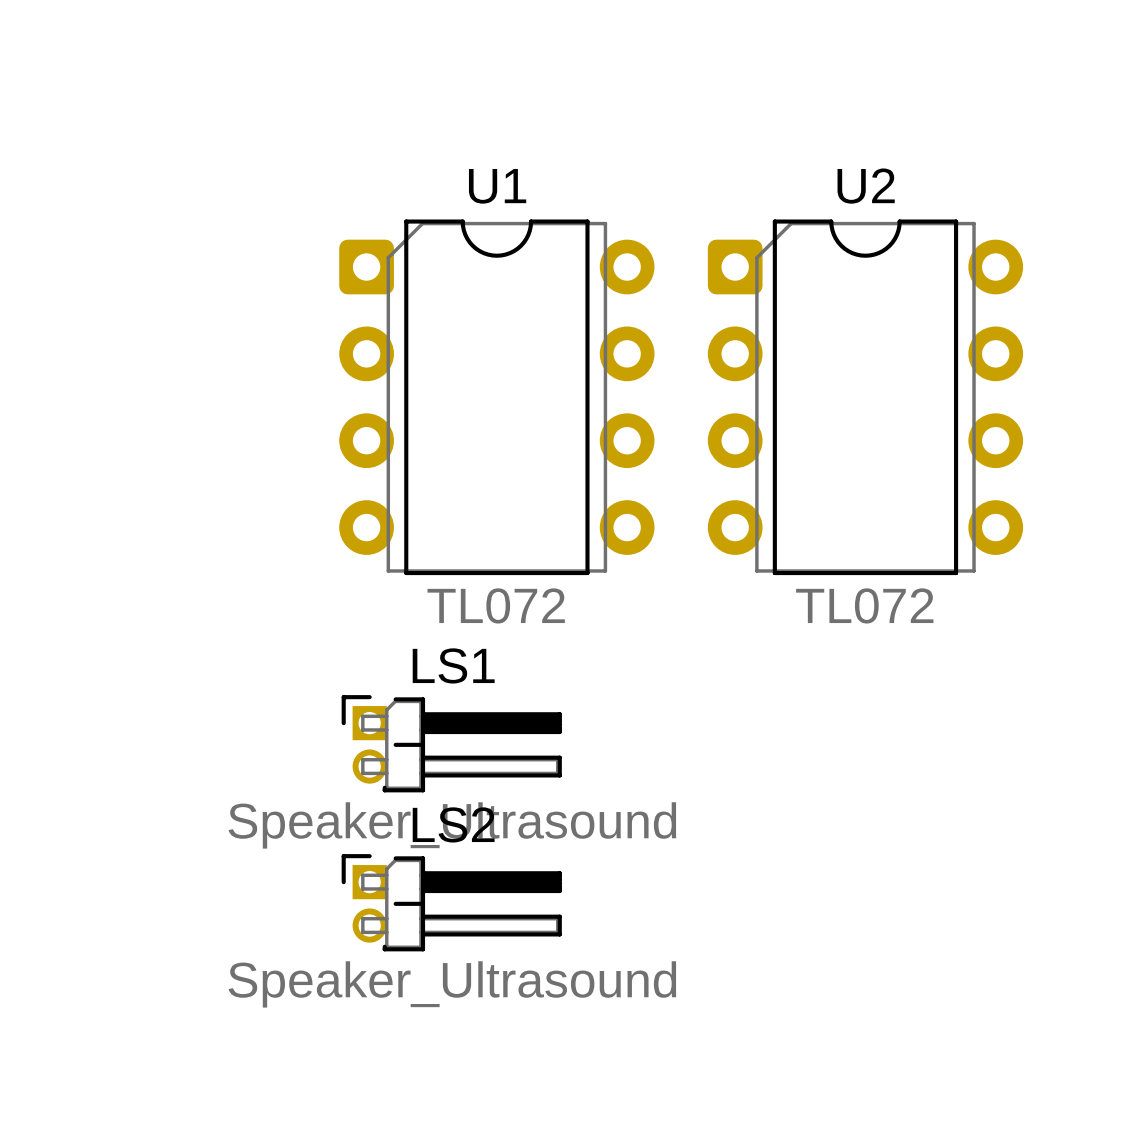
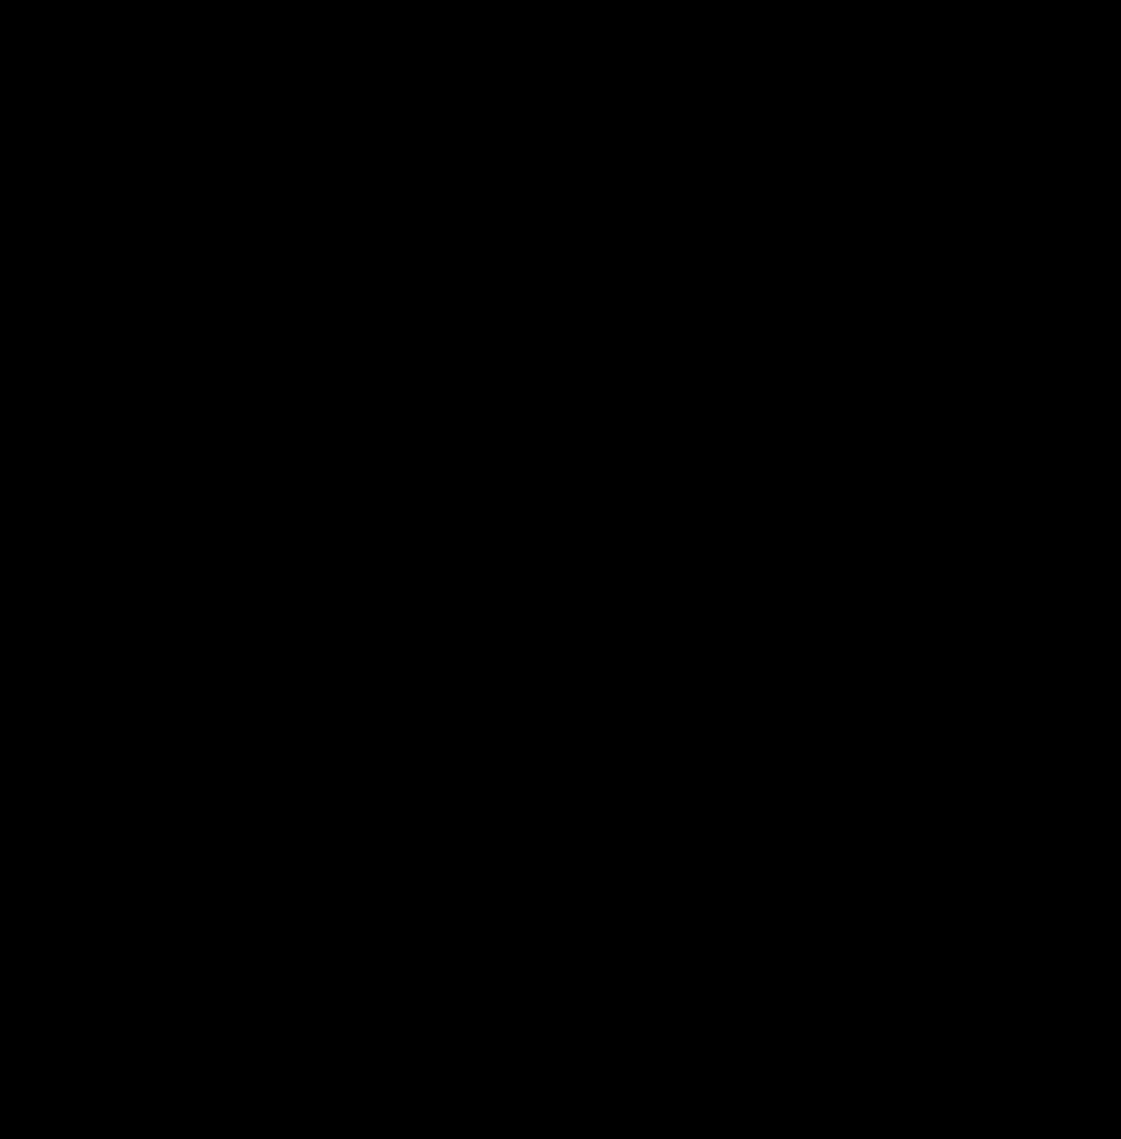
U1: TL072 (496, 397) -> none
U2: TL072 (865, 397) -> none
LS1: Speaker_Ultrasound (451, 743) -> none
LS2: Speaker_Ultrasound (451, 902) -> none

